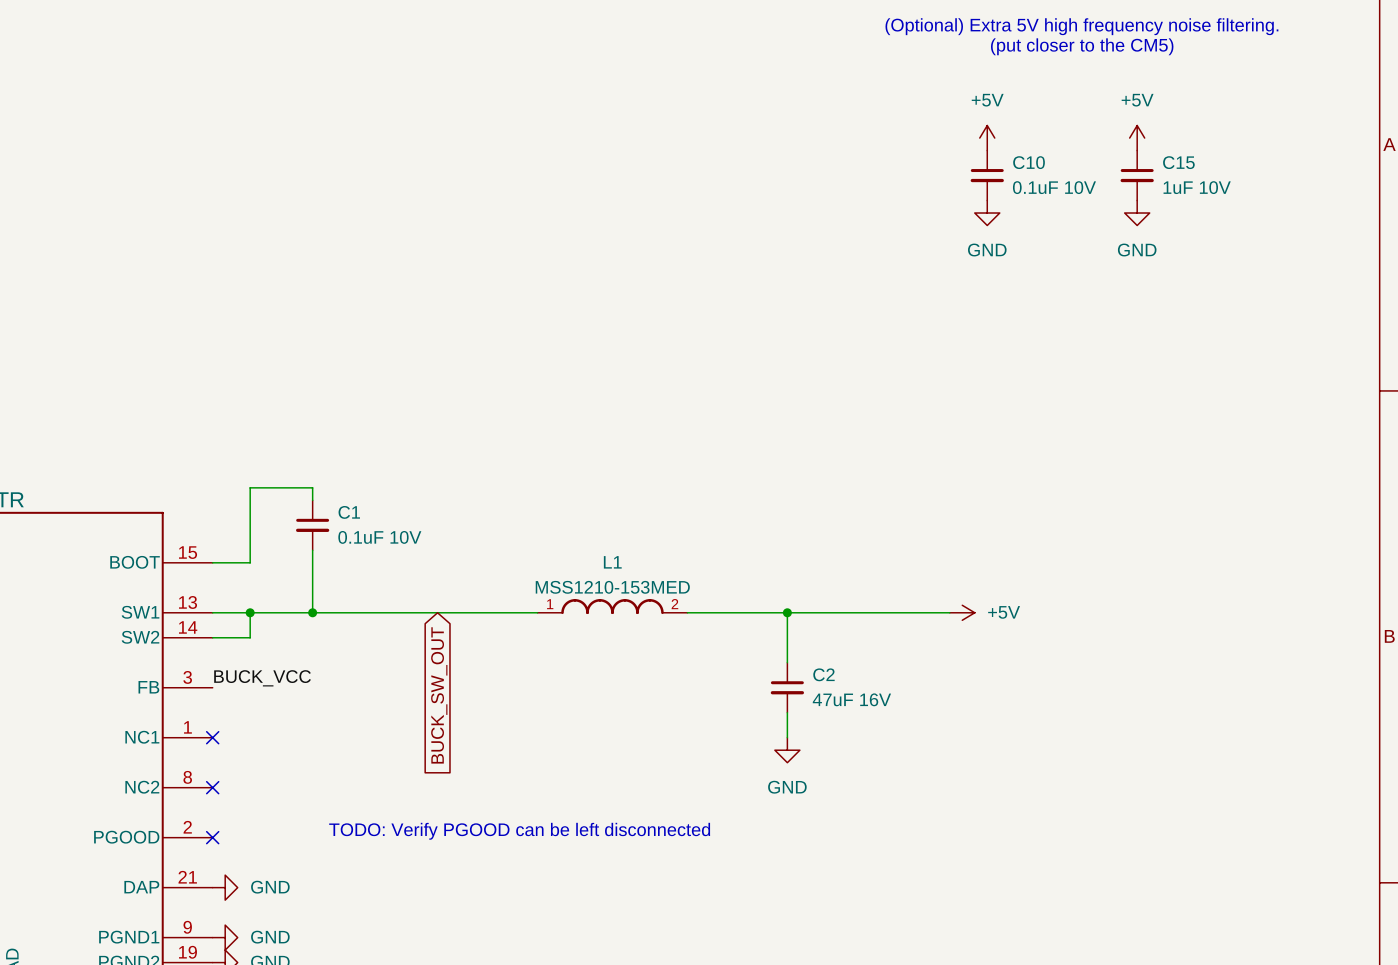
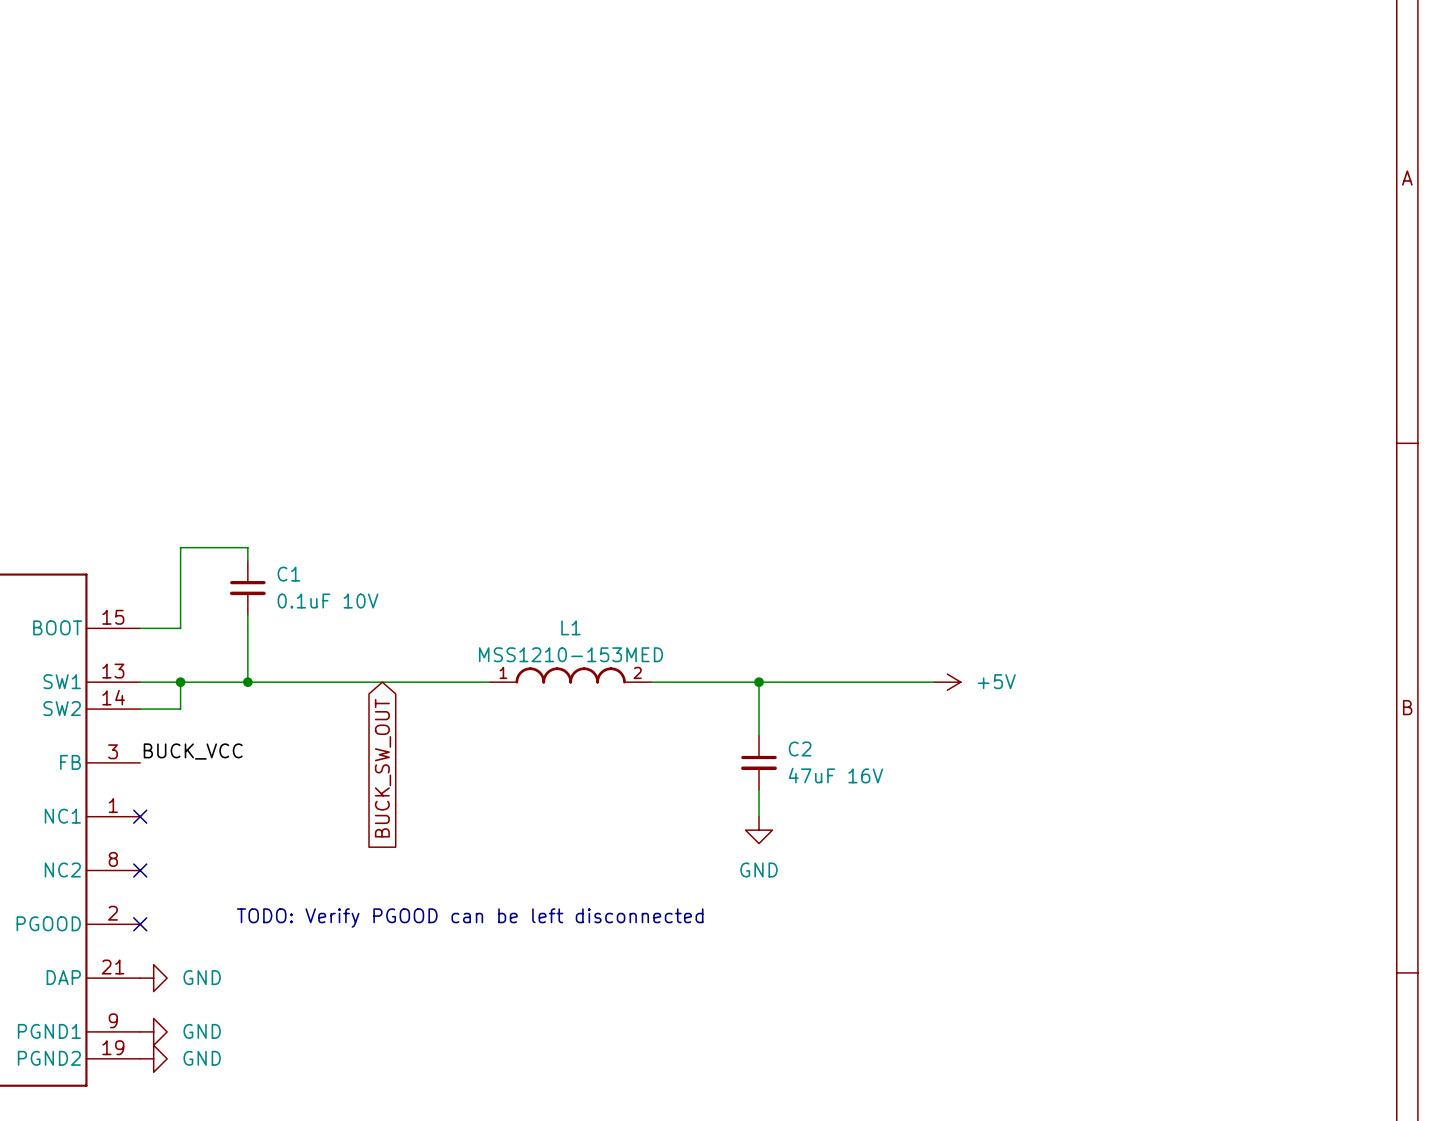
text: (Optional) Extra 5V high frequency noise filtering. (1081, 26) -> none
text: (put closer to the CM5) (1082, 46) -> none
power symbol: +5V (987, 138) -> none
power symbol: +5V (1137, 138) -> none
C10: 0.1uF 10V (987, 175) -> none
C15: 1uF 10V (1137, 175) -> none
power symbol: GND (987, 213) -> none
power symbol: GND (1137, 213) -> none

